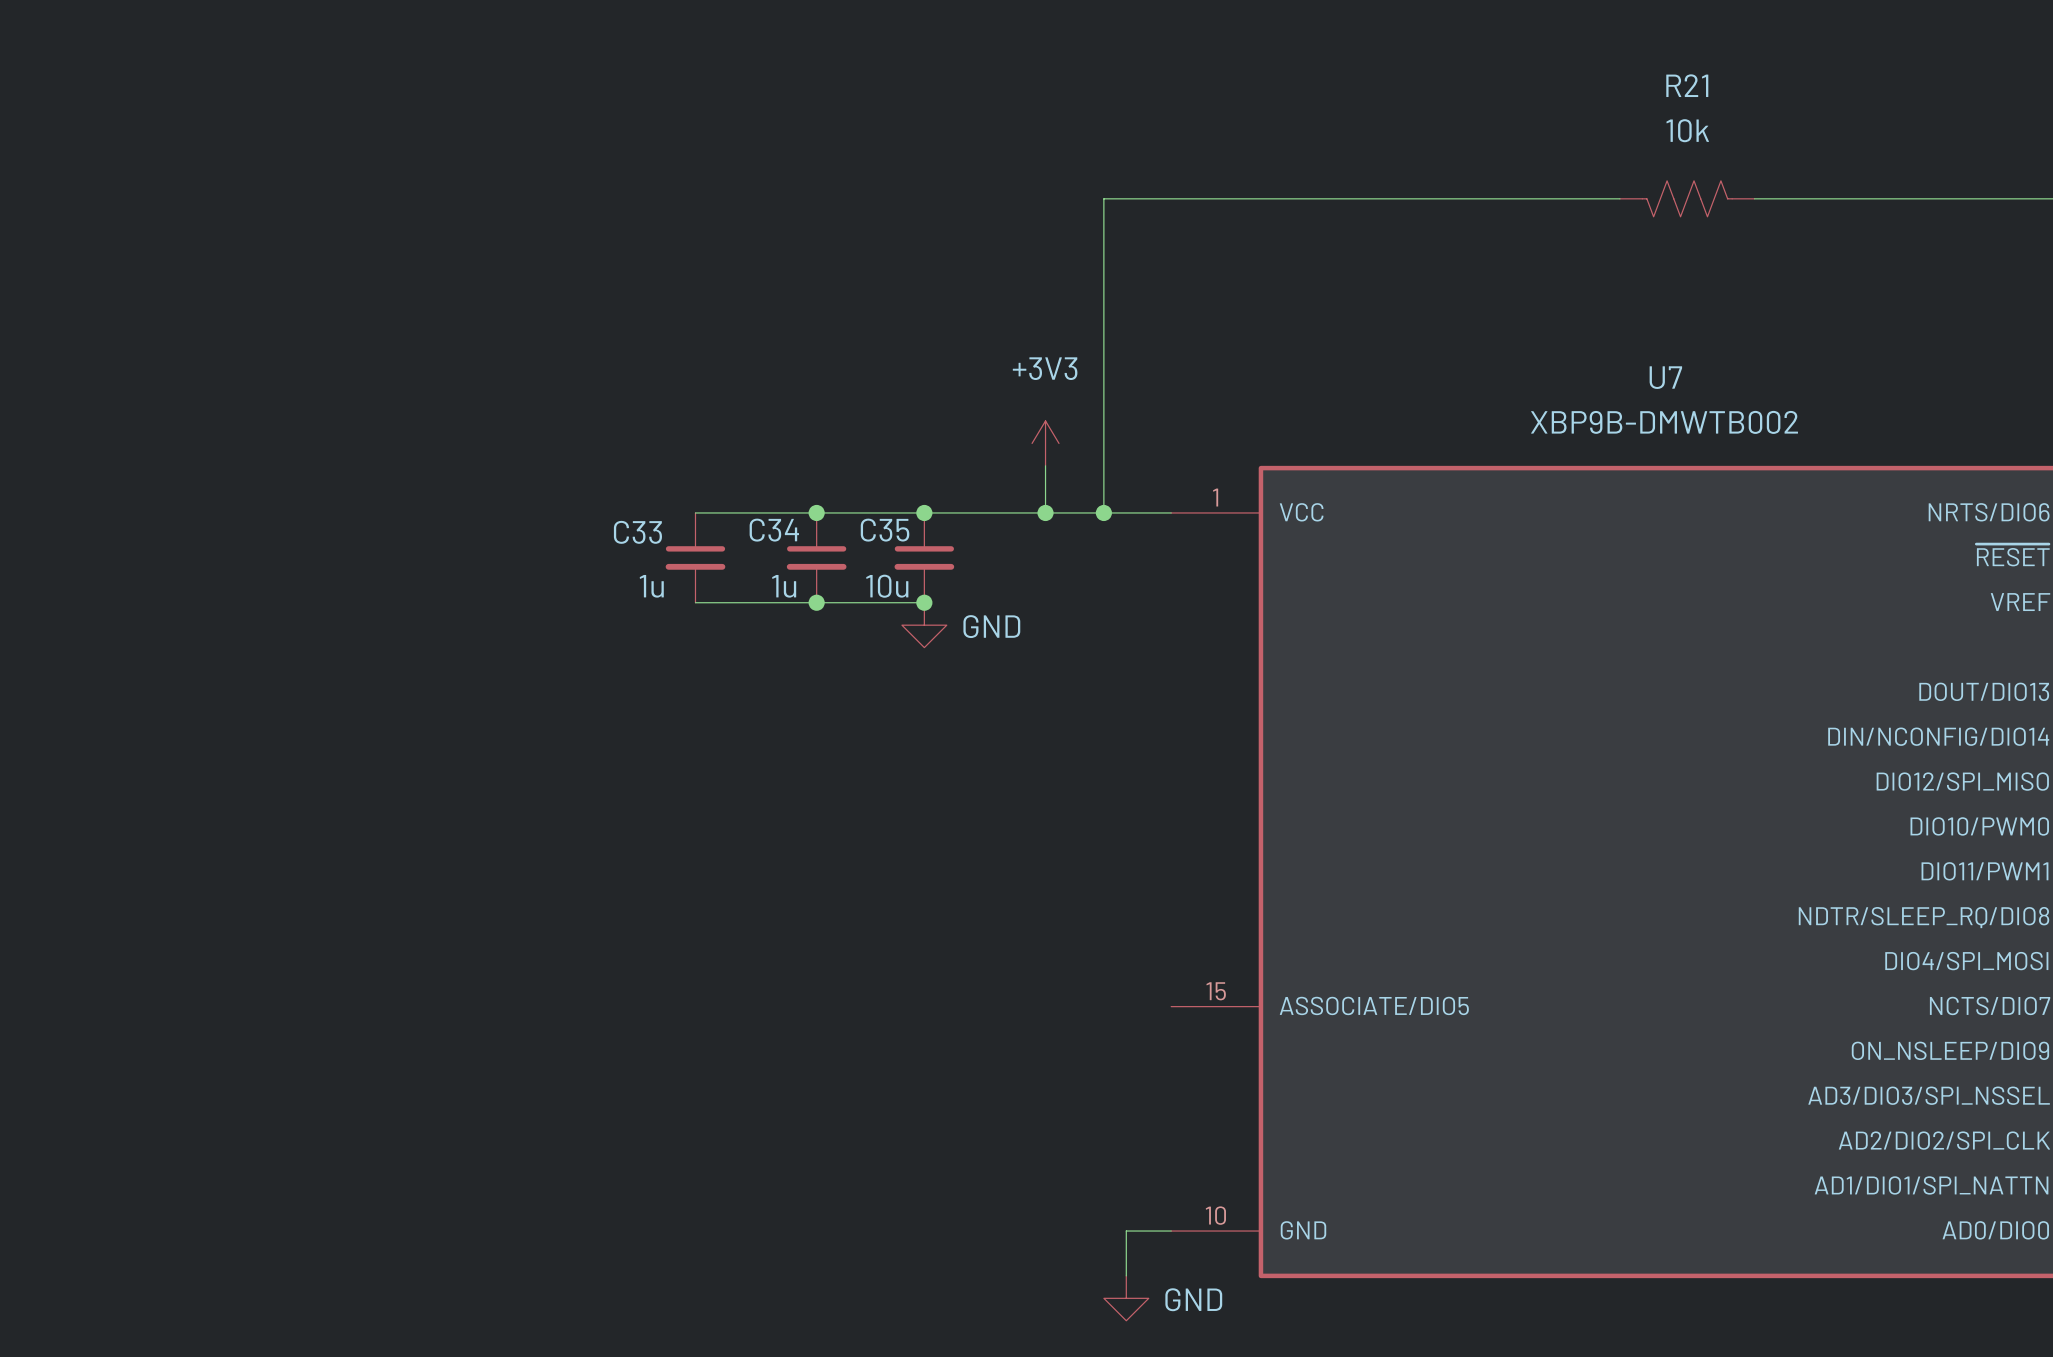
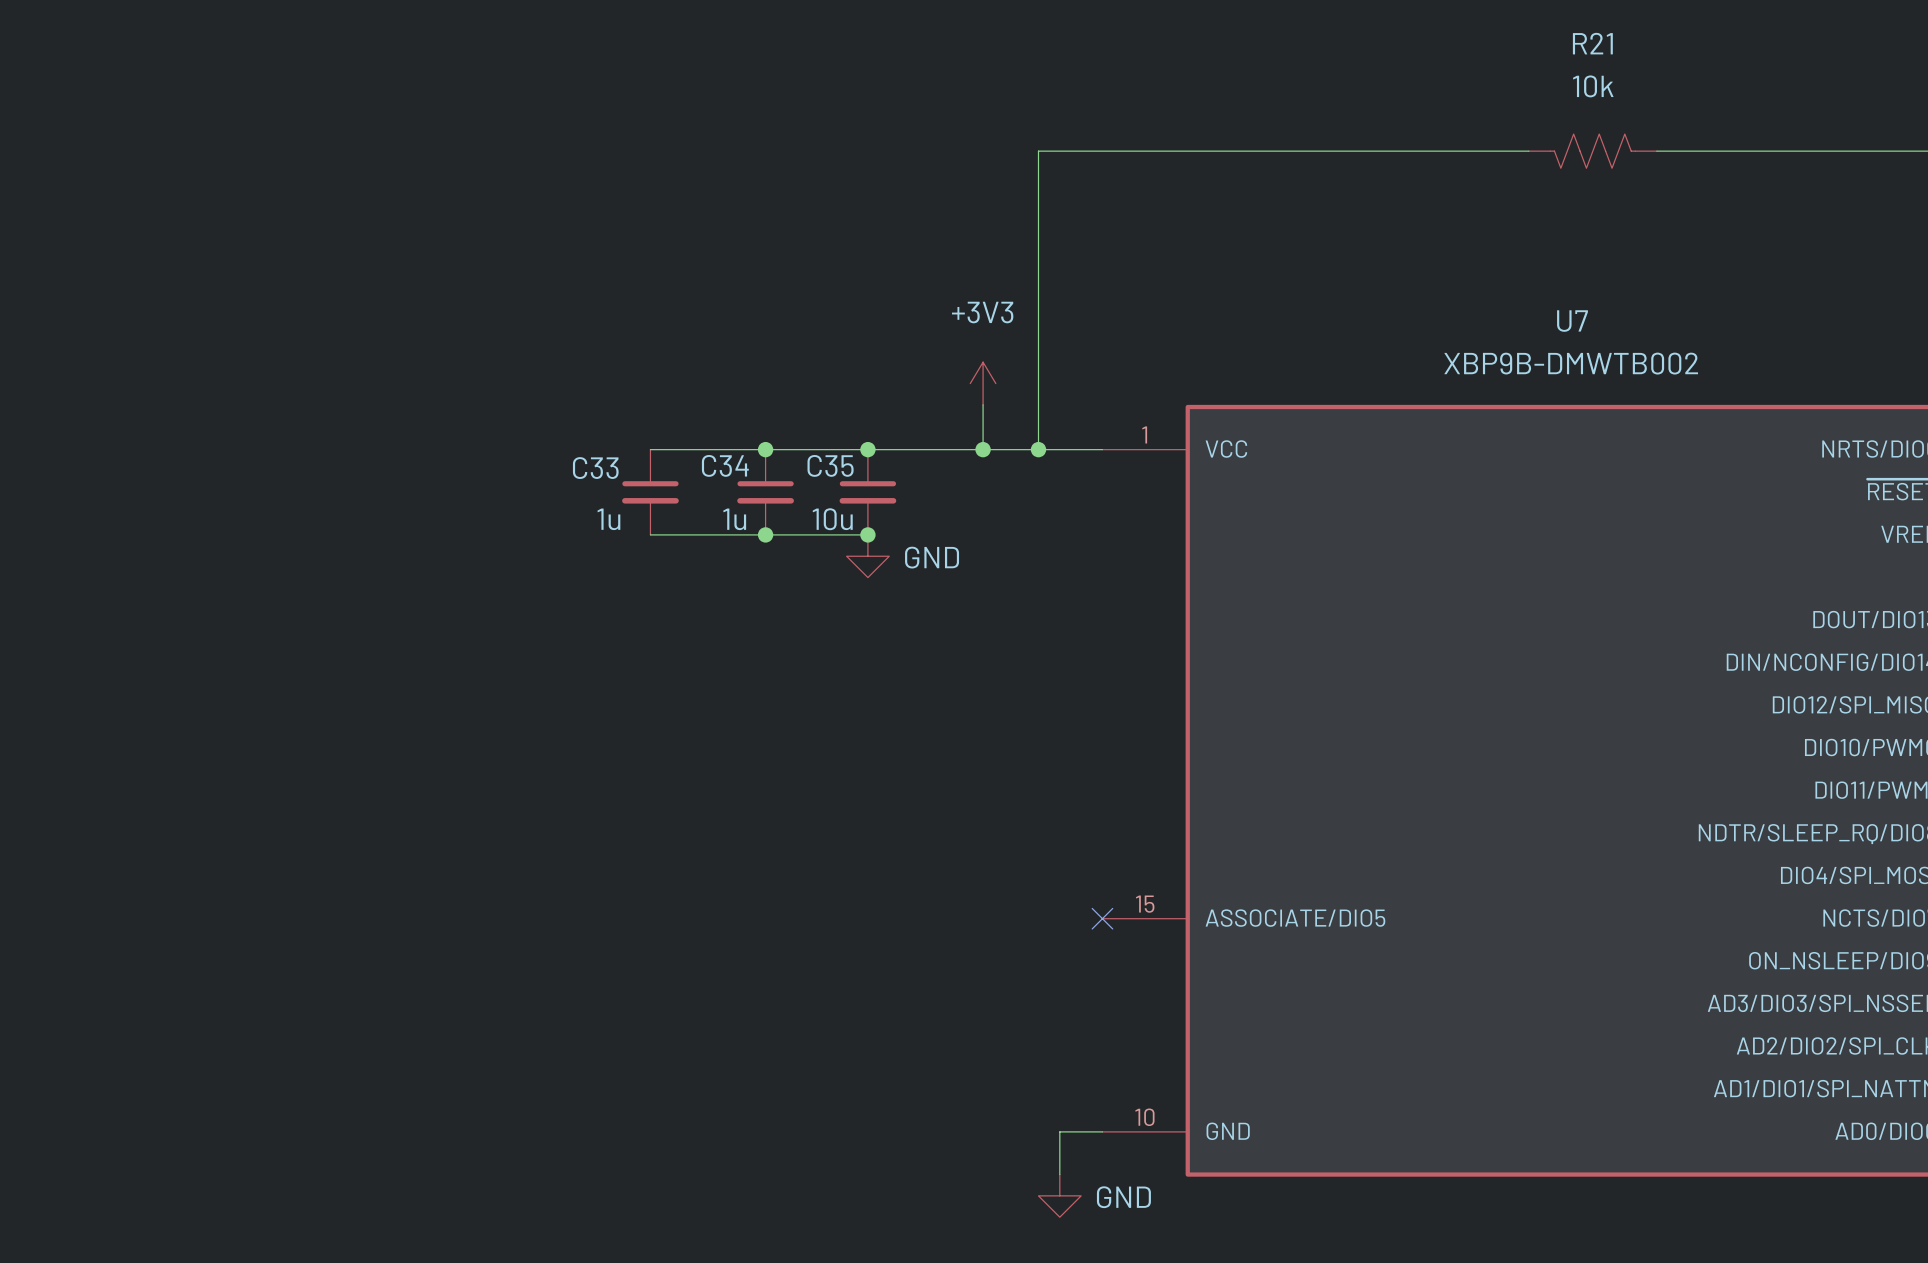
no-connect mark: none -> (1102, 918)

